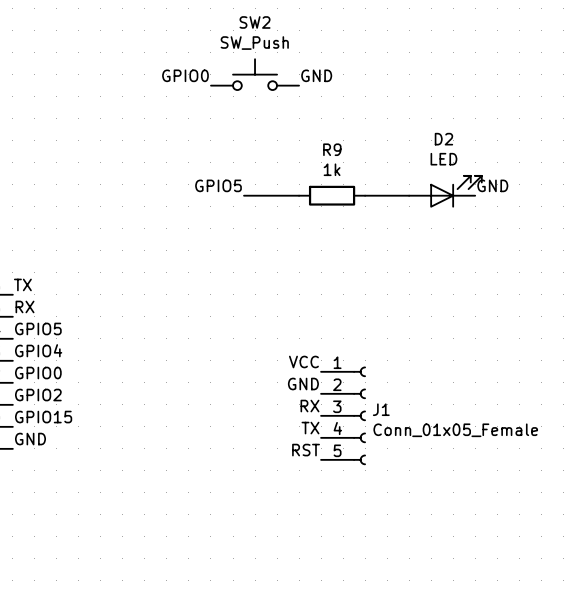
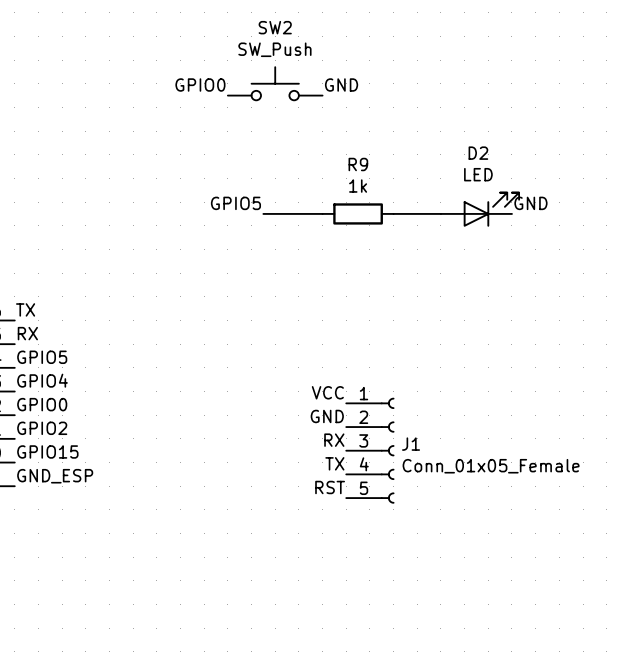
label: GND (30, 439) -> GND_ESP (55, 476)

